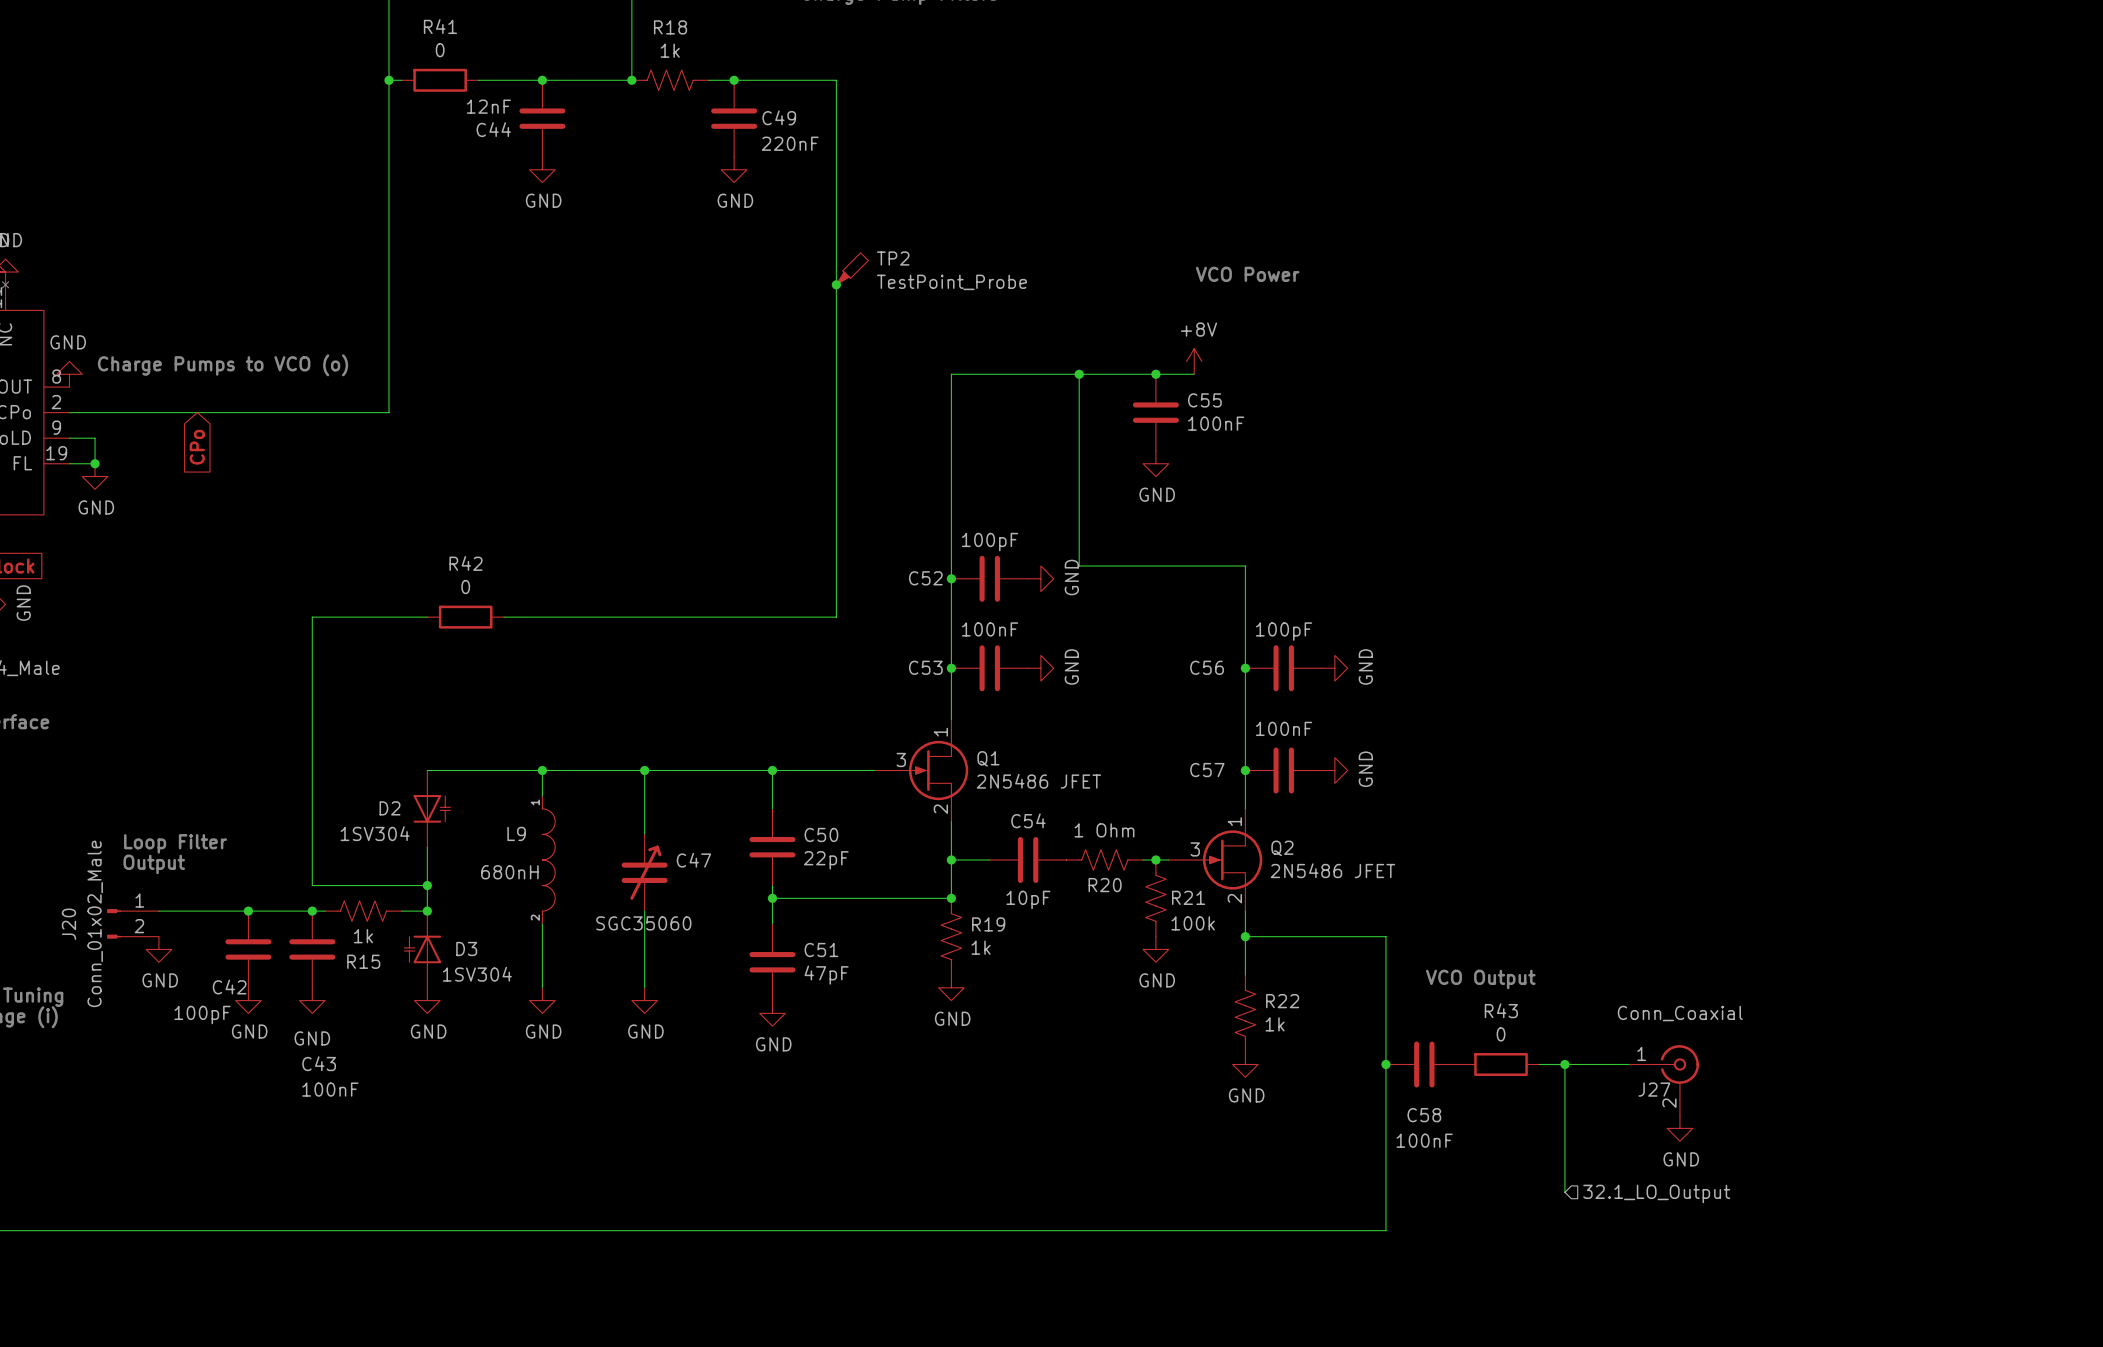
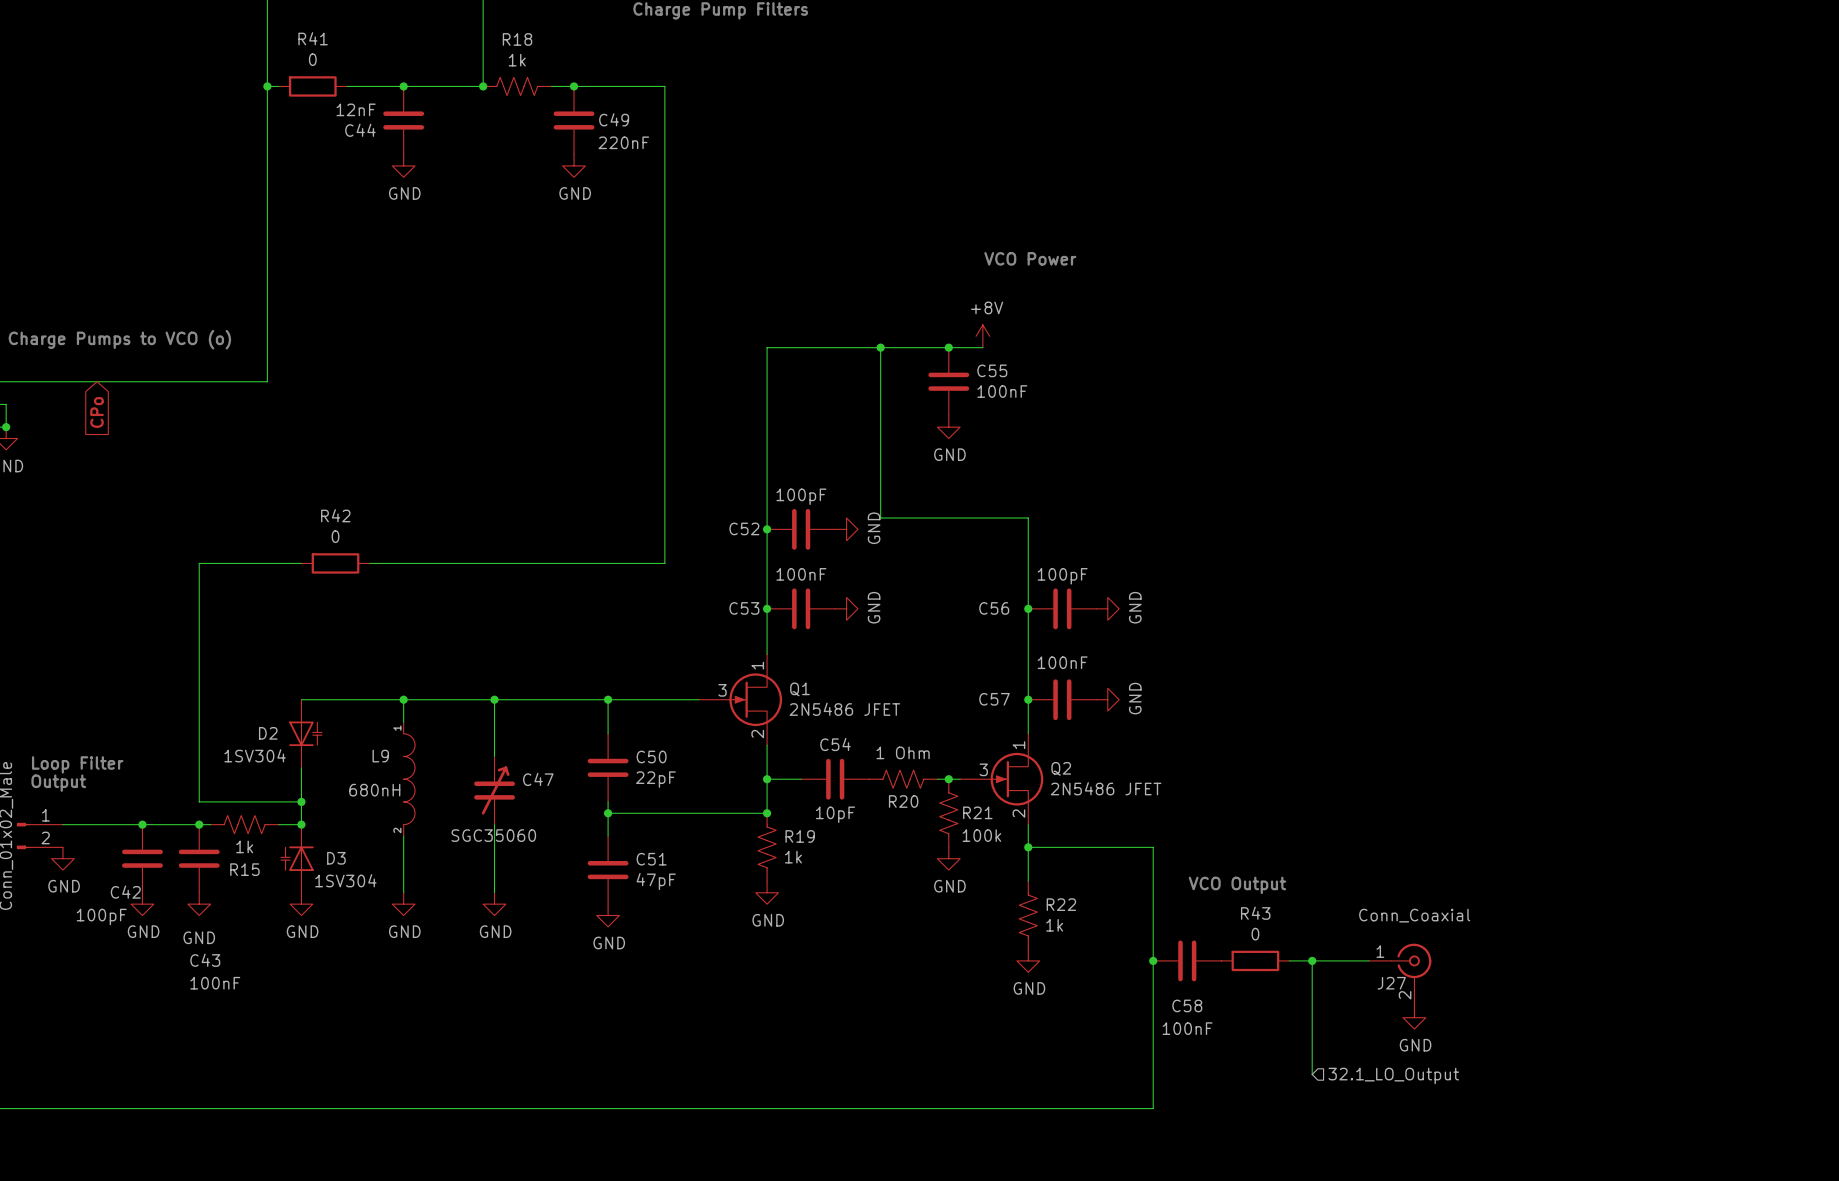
TP2: TestPoint_Probe (852, 268) -> none
junction: (836, 284) -> none

